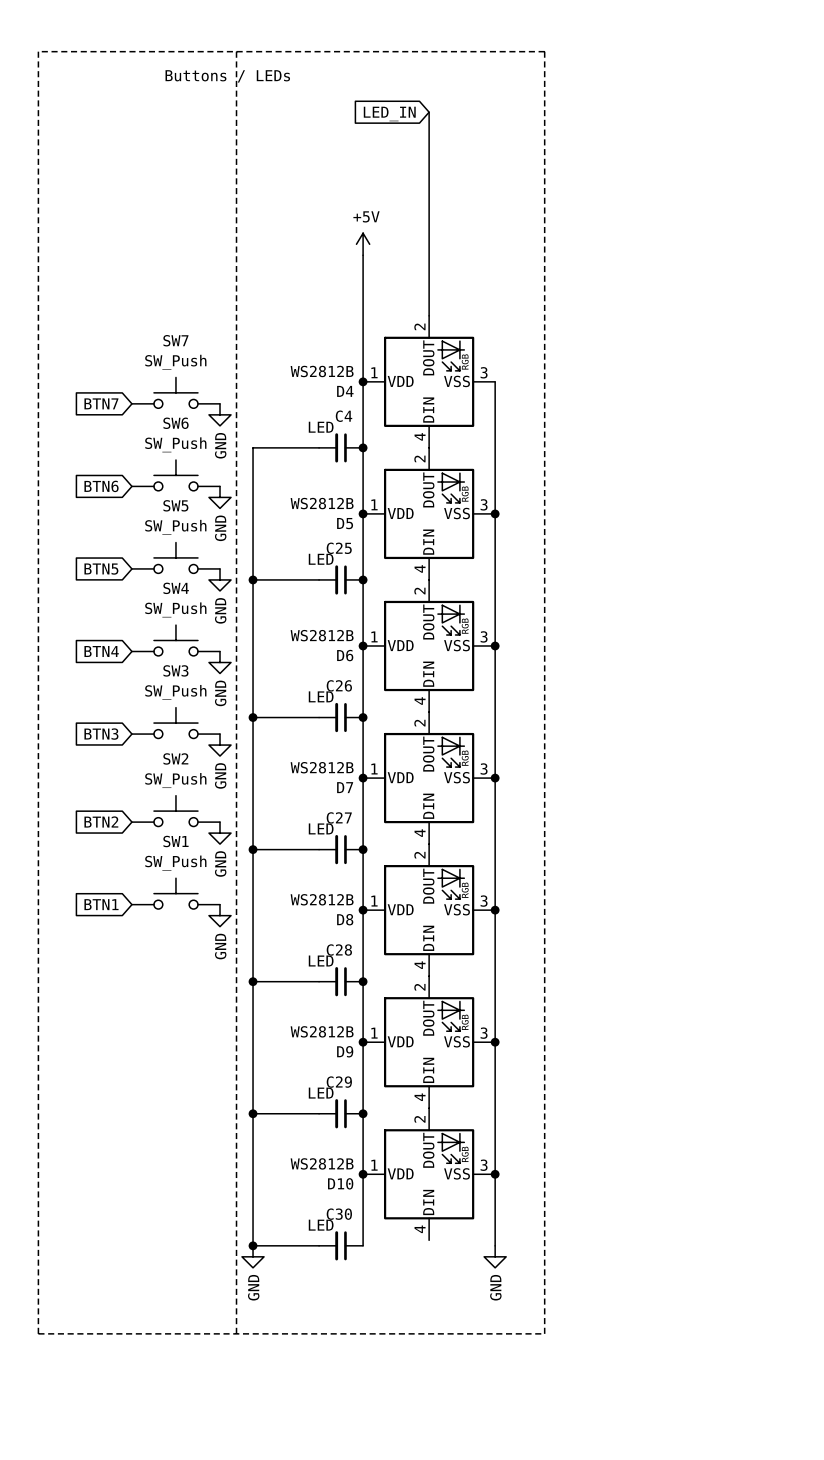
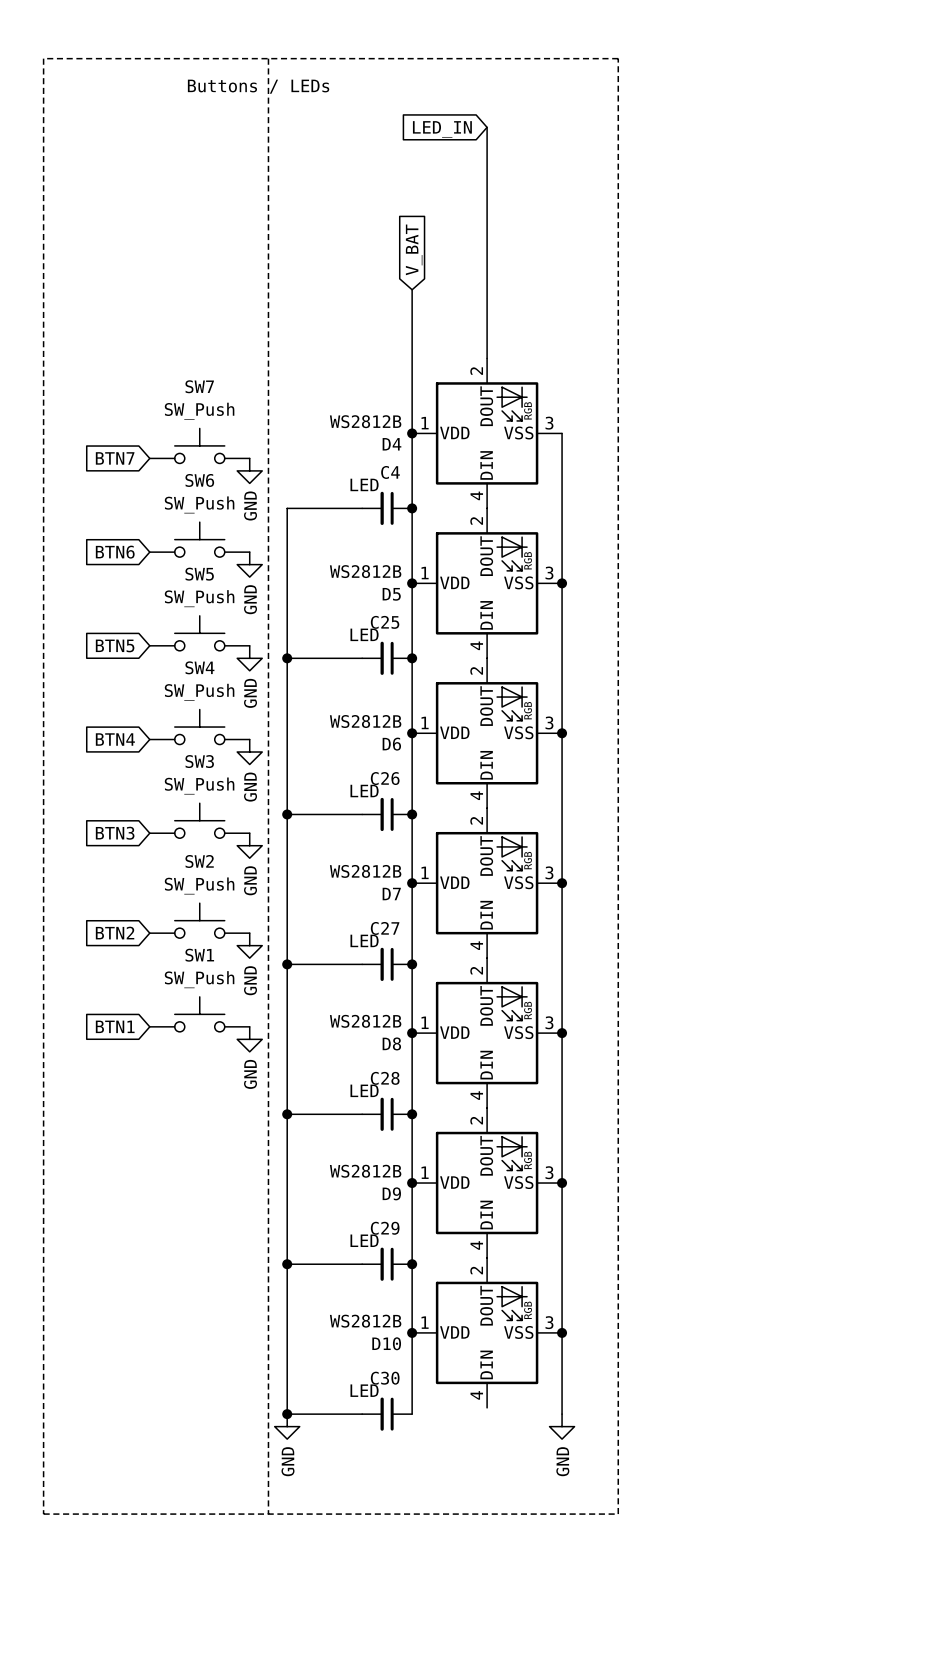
global label: none -> V_BAT (414, 249)
power symbol: +5V (363, 244) -> none

